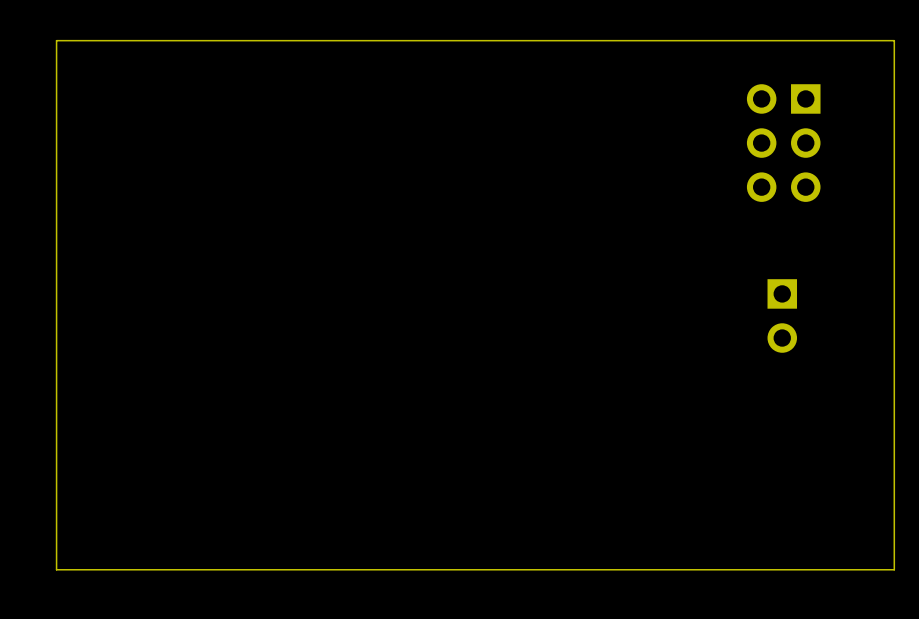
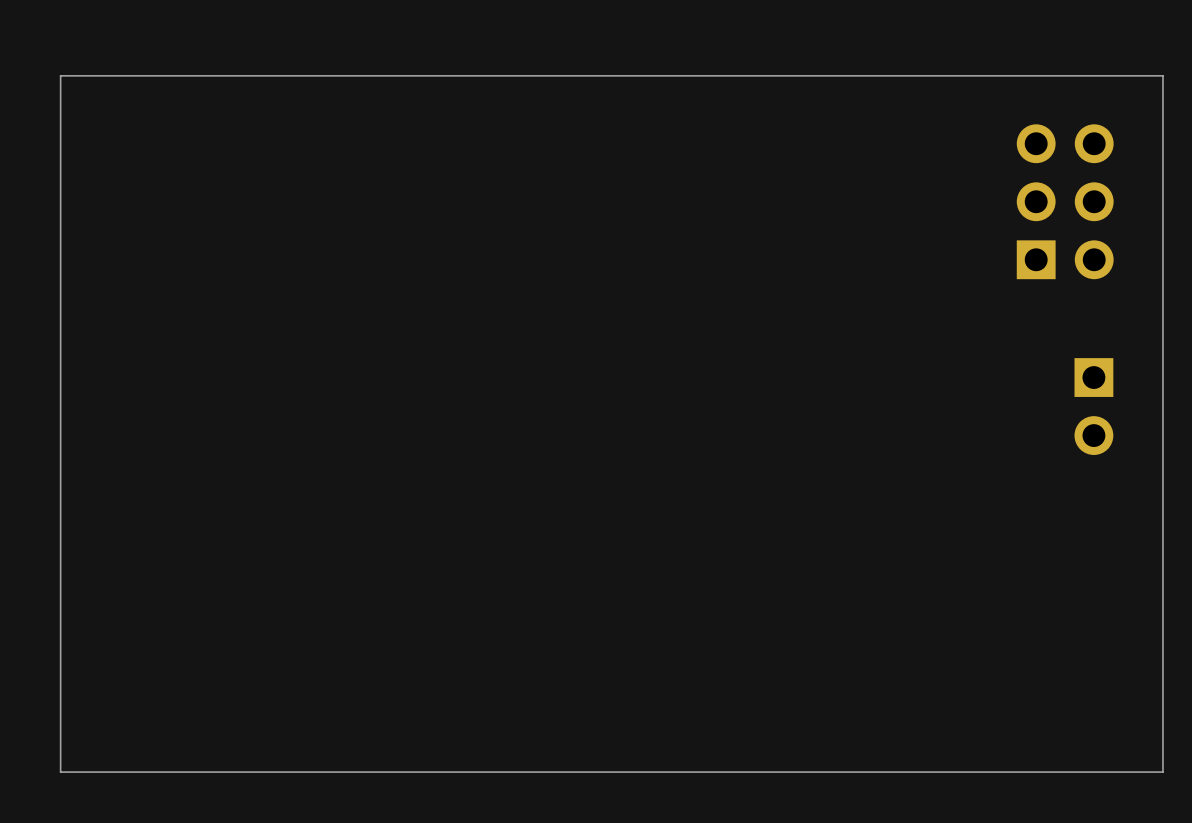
part rotation: 0° (783, 143) -> 180° (1065, 201)
part position: (782, 315) -> (1093, 406)

